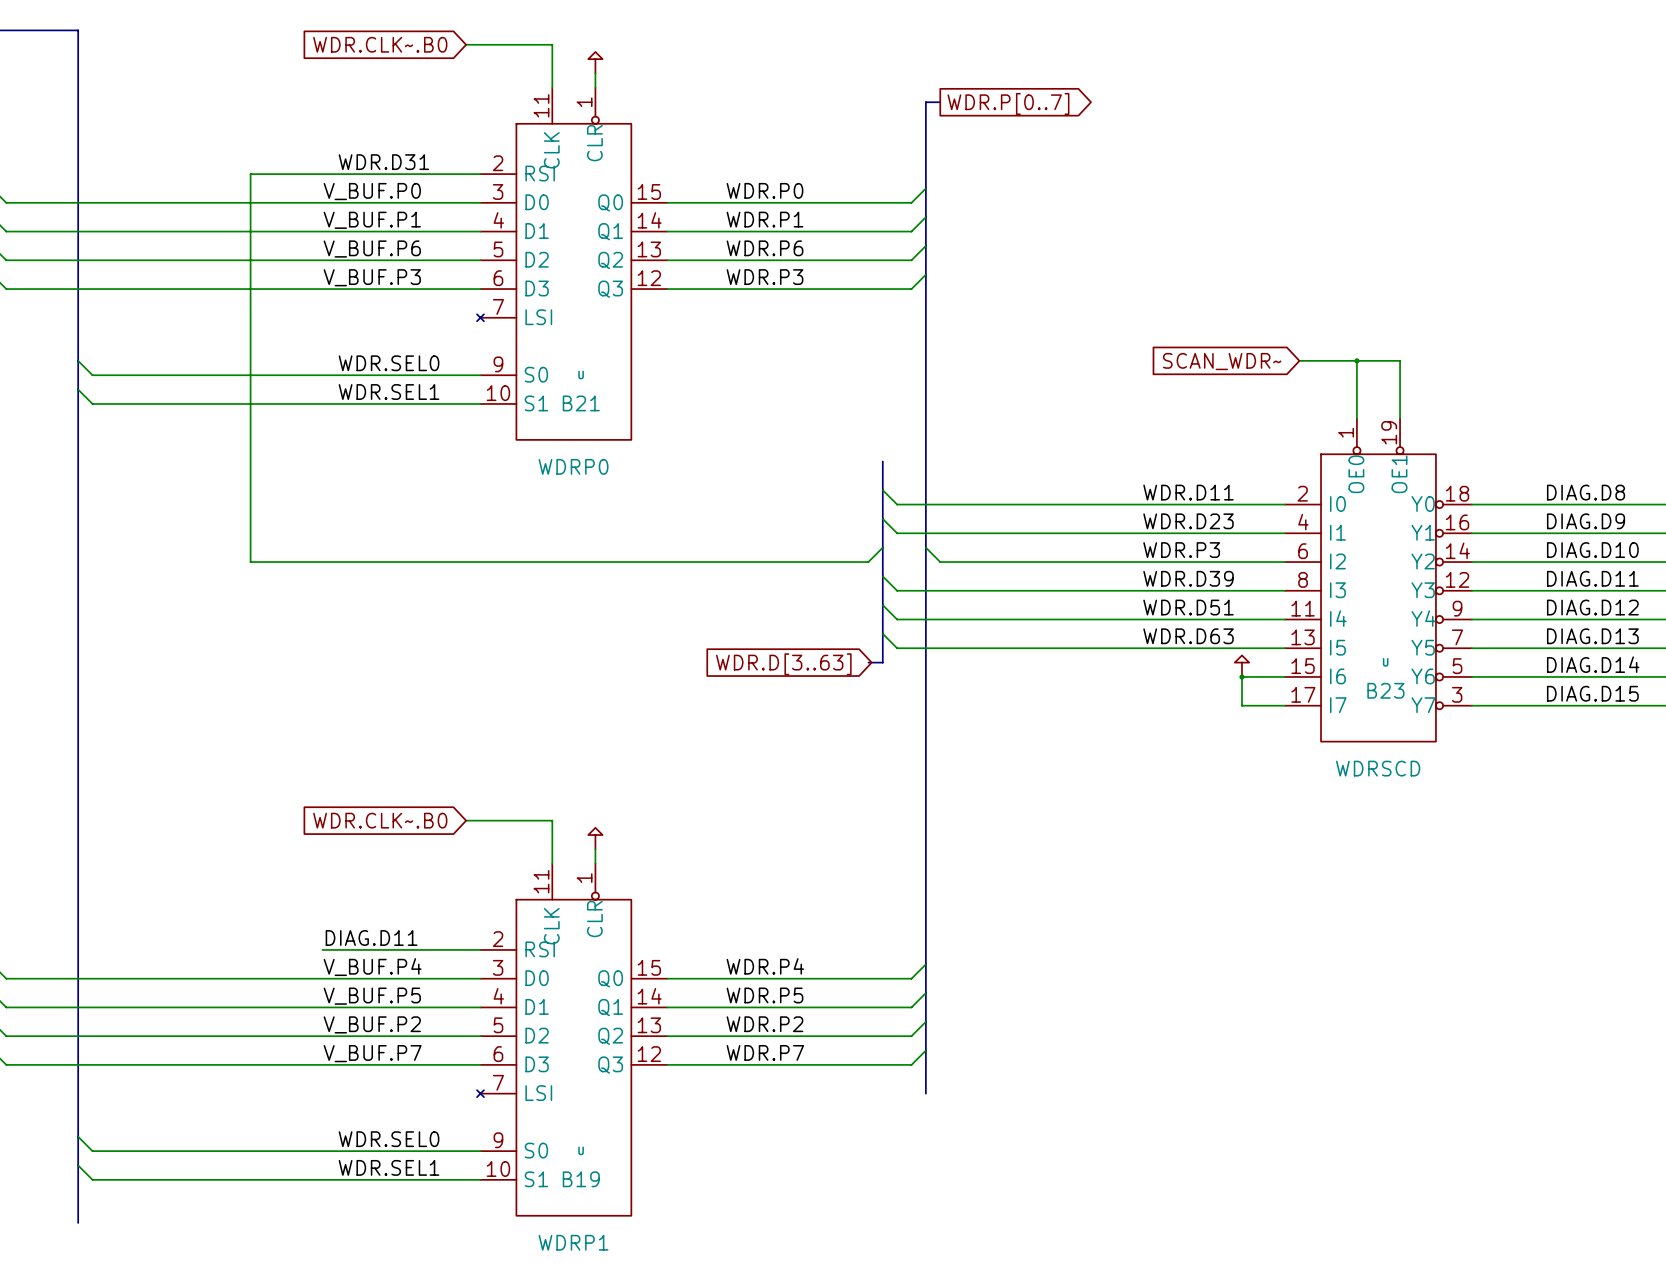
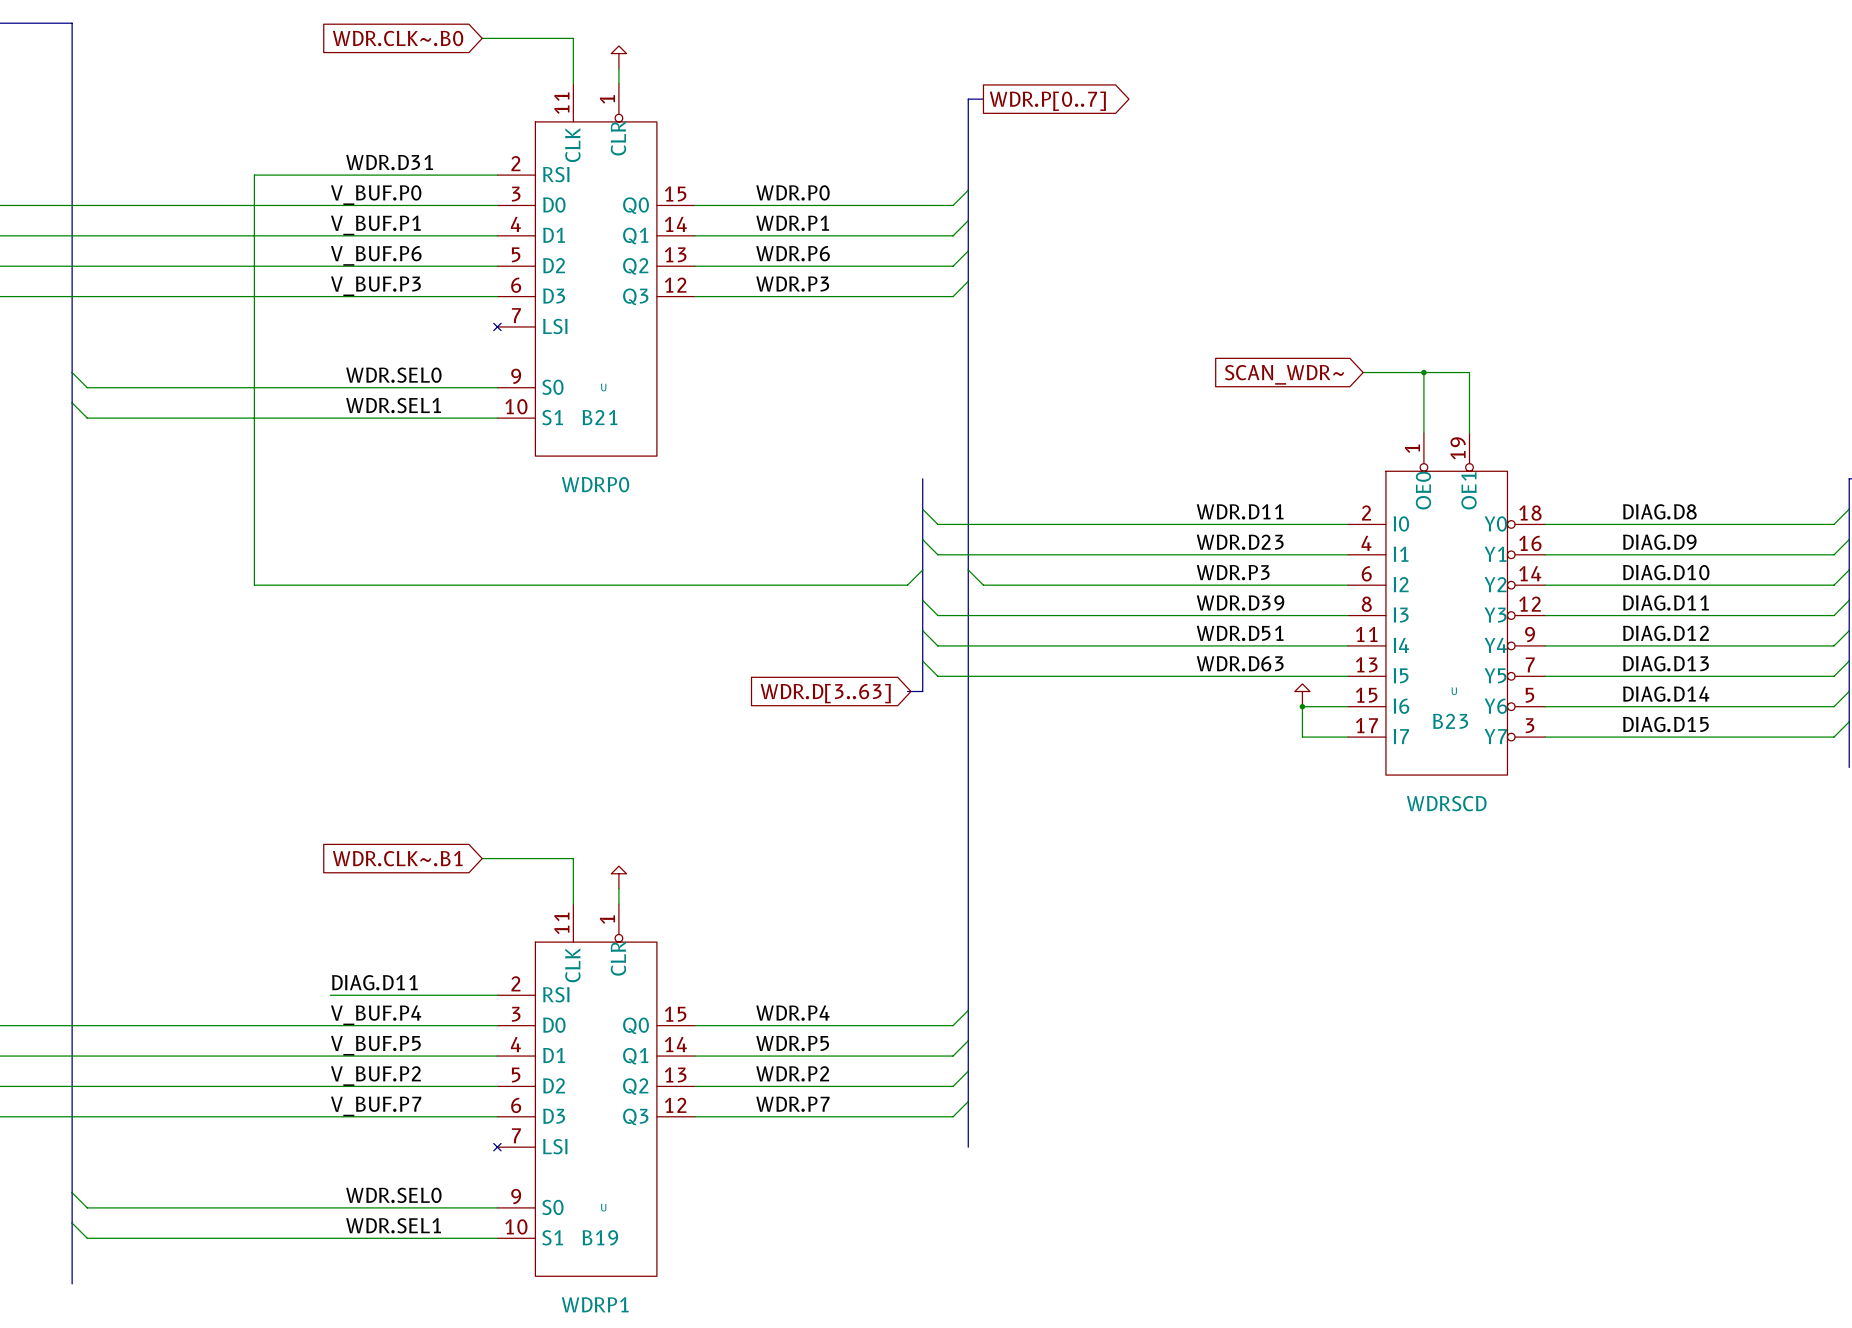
global label: WDR.CLK~.B0 (380, 820) -> WDR.CLK~.B1 (397, 858)

